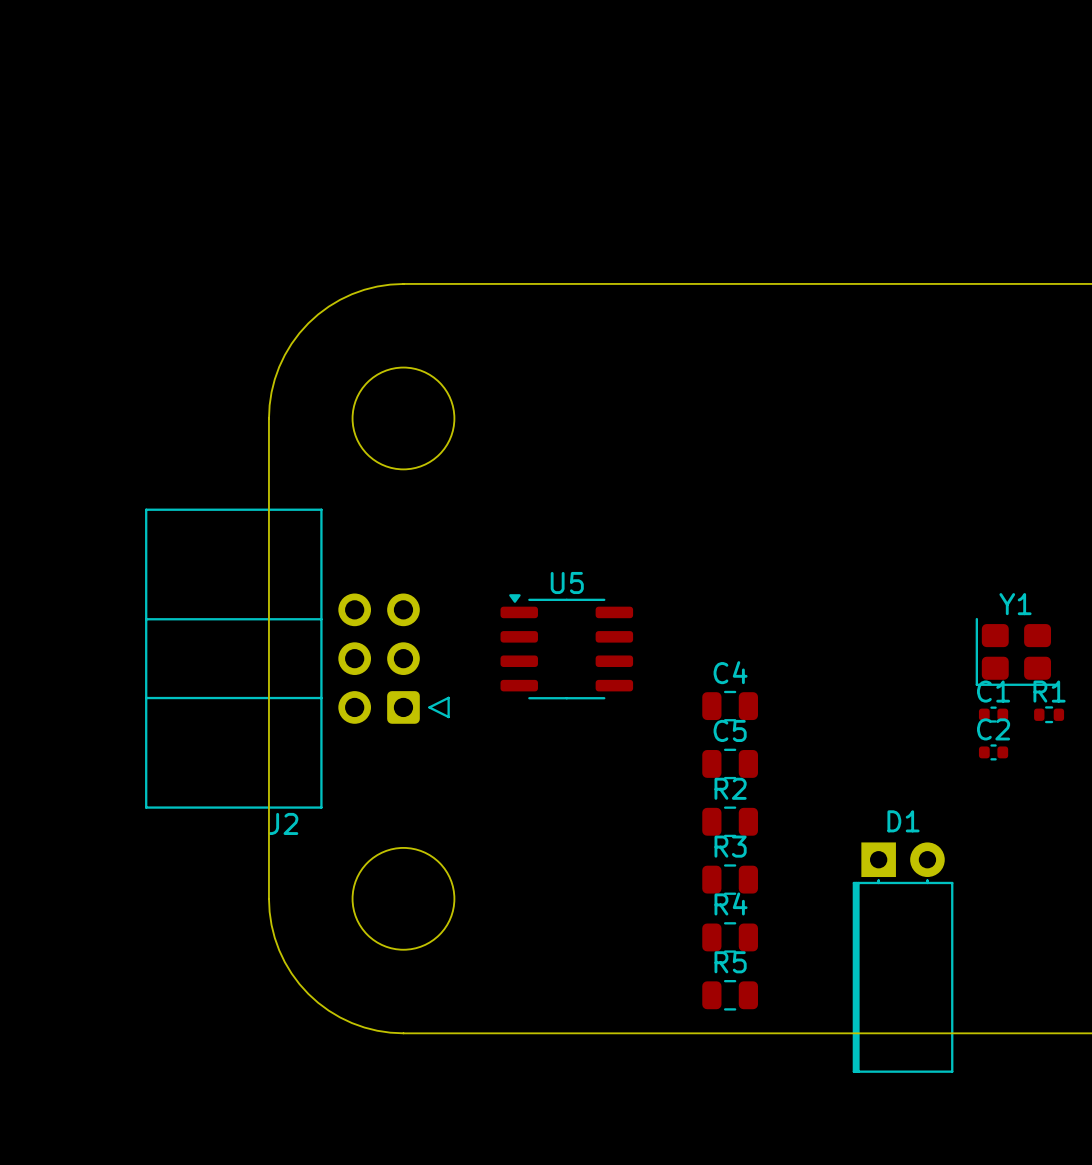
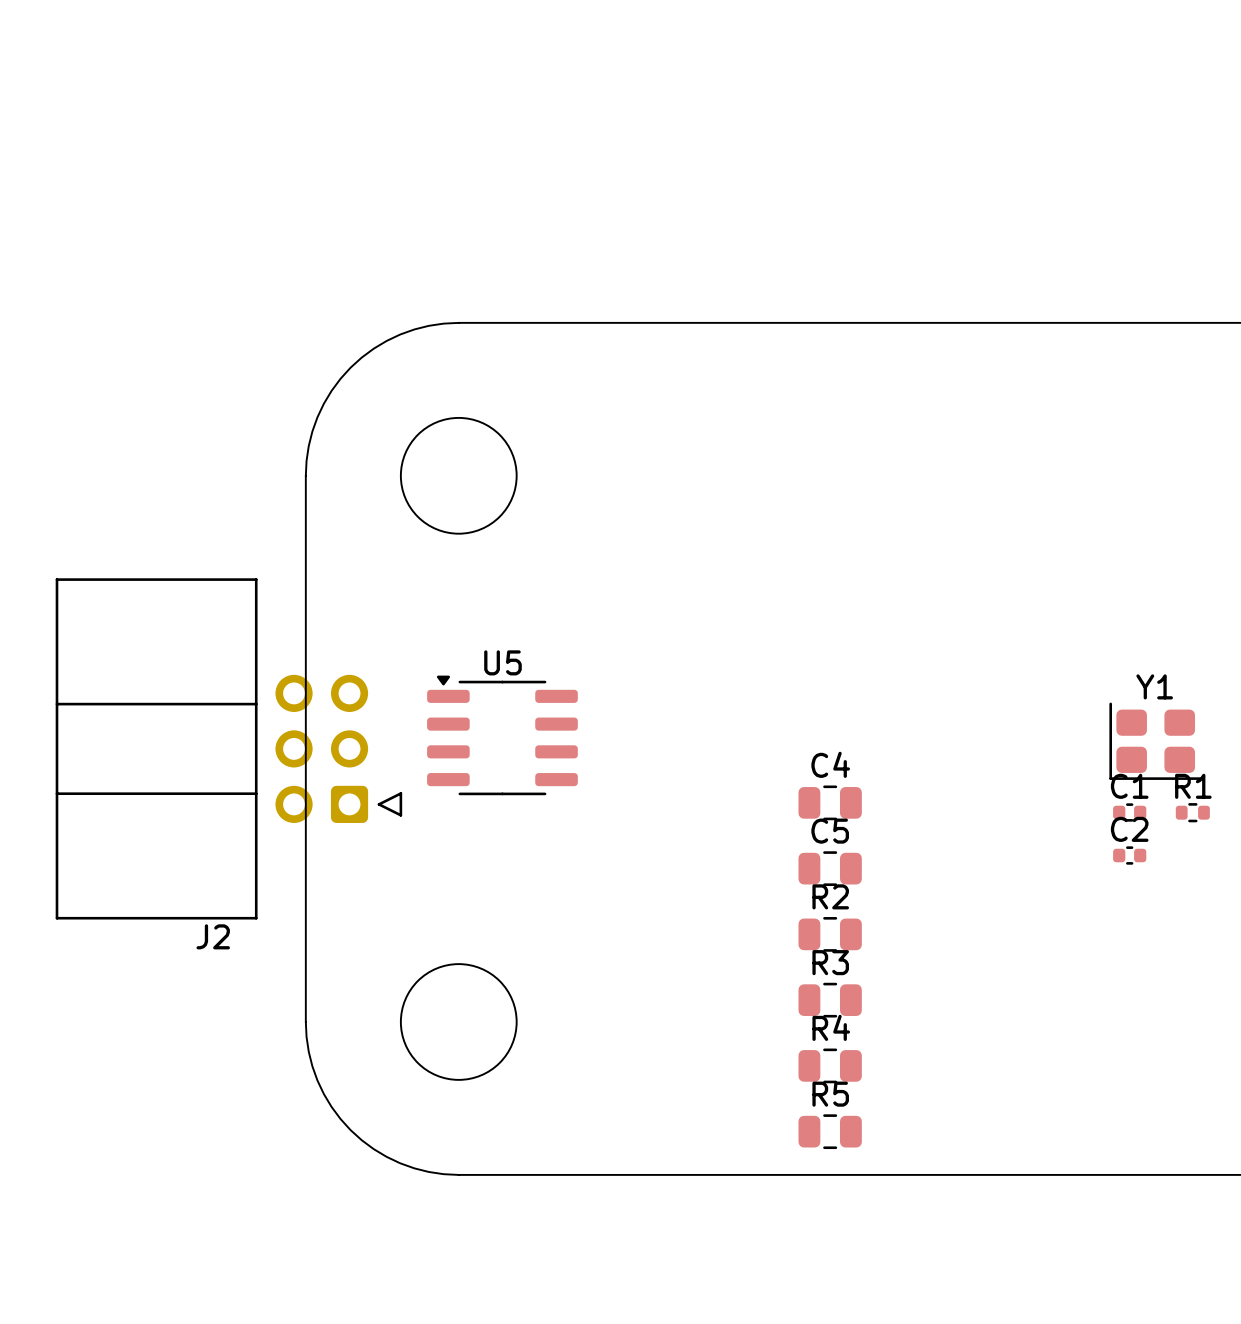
U5 position: (566, 646) -> (502, 735)
J2 position: (297, 658) -> (228, 748)
D1: (903, 957) -> none

